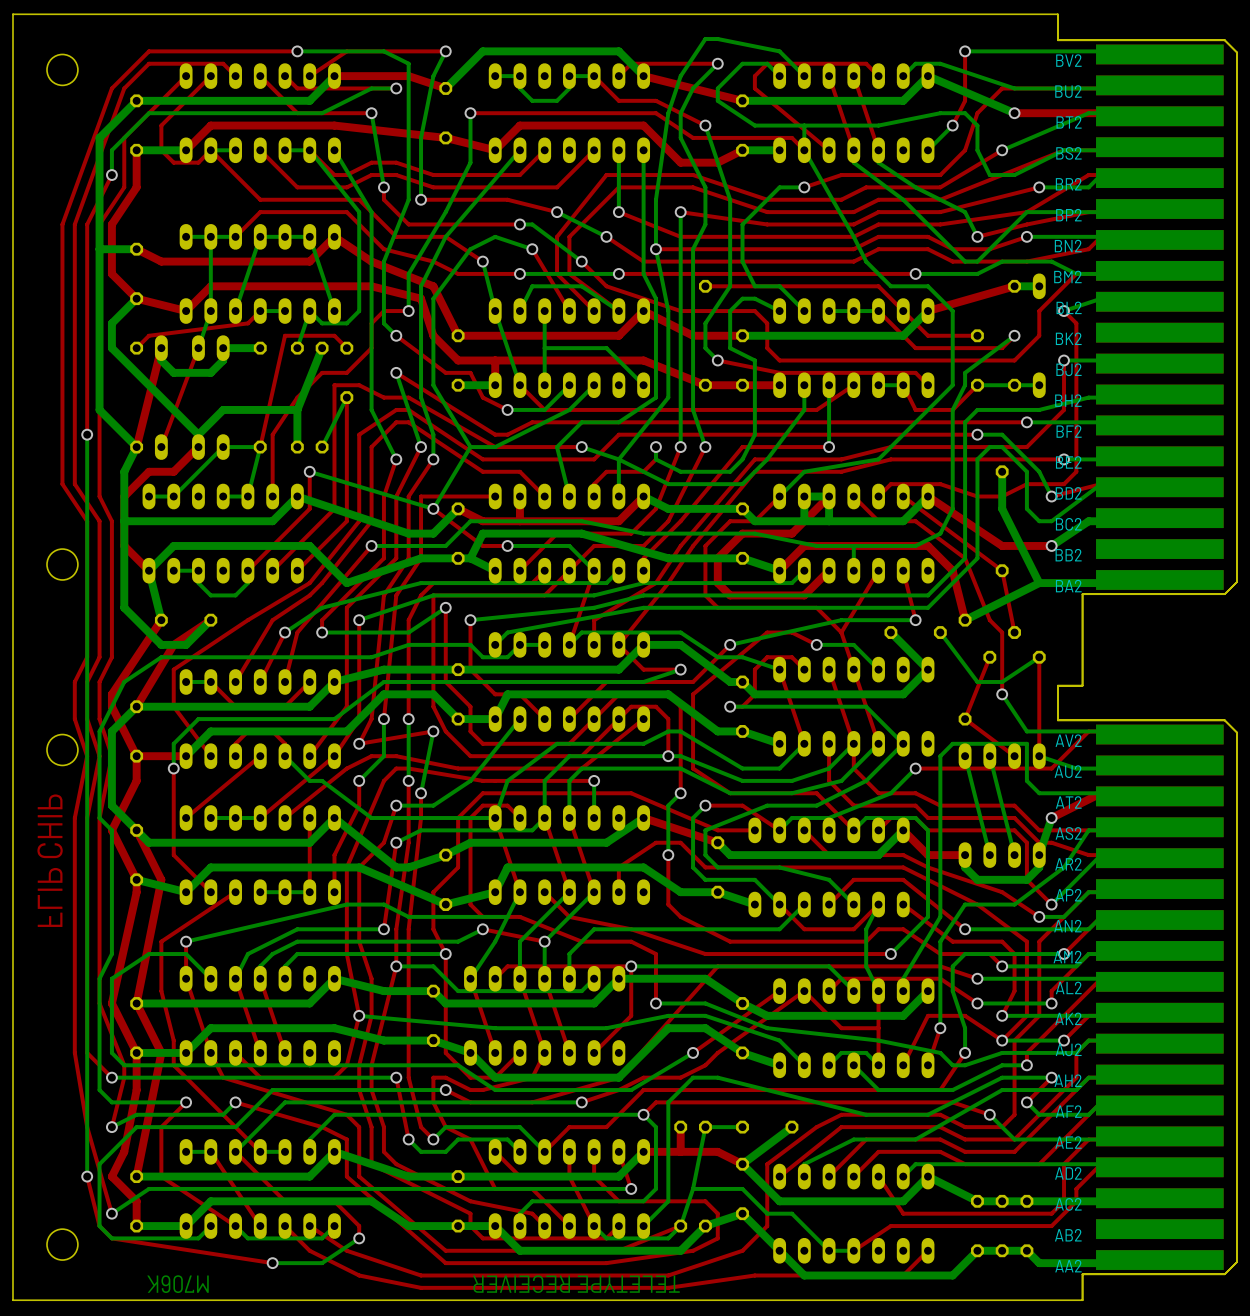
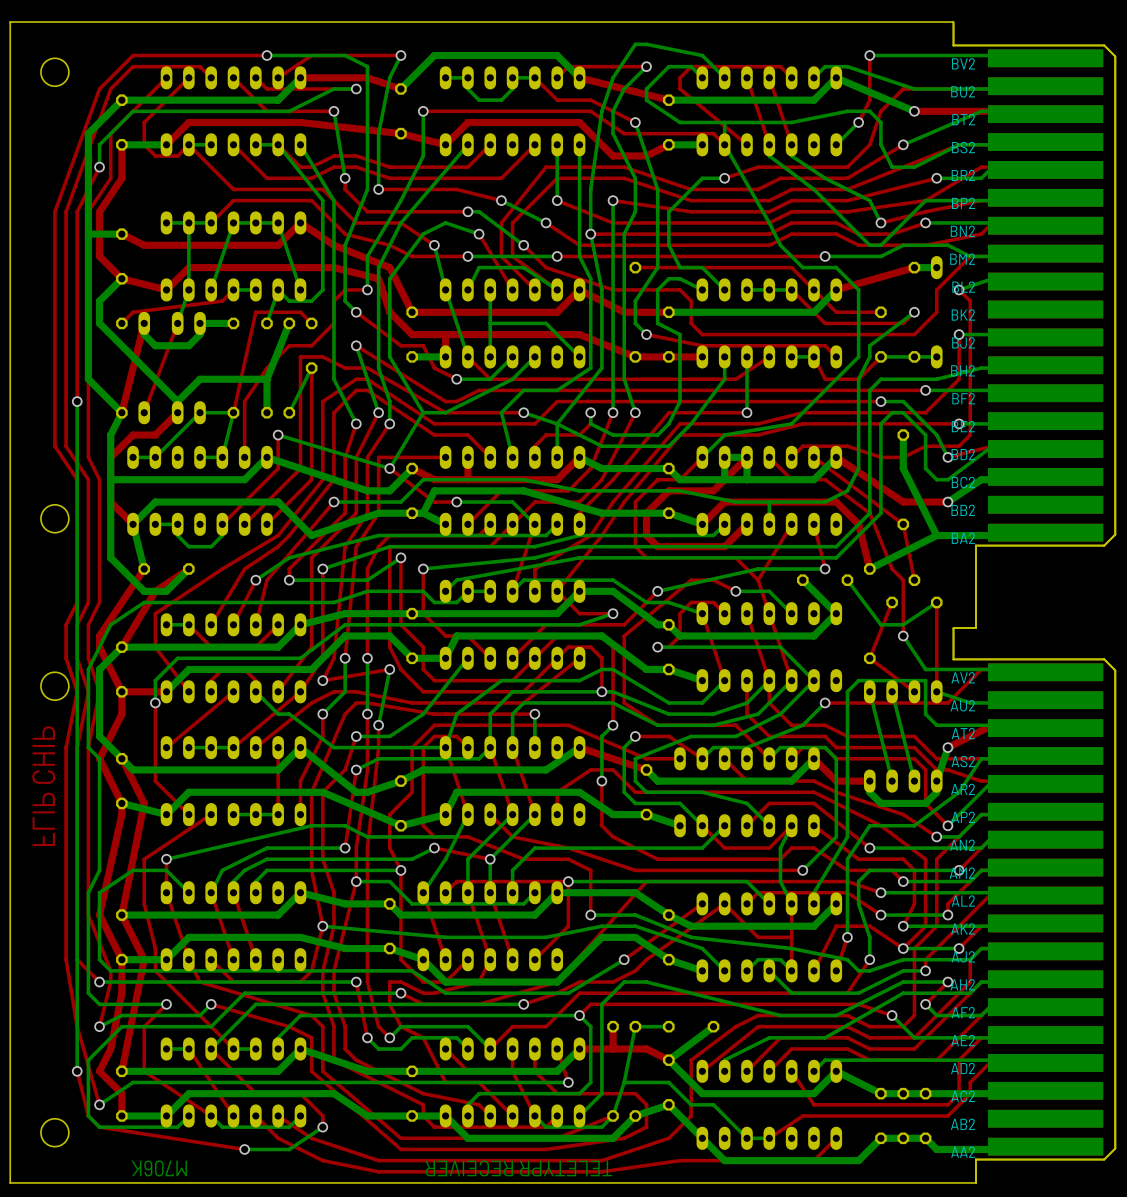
text: TELETYPE RECEIVER (576, 1284) -> TELETYPR RECEIVER (518, 1168)

